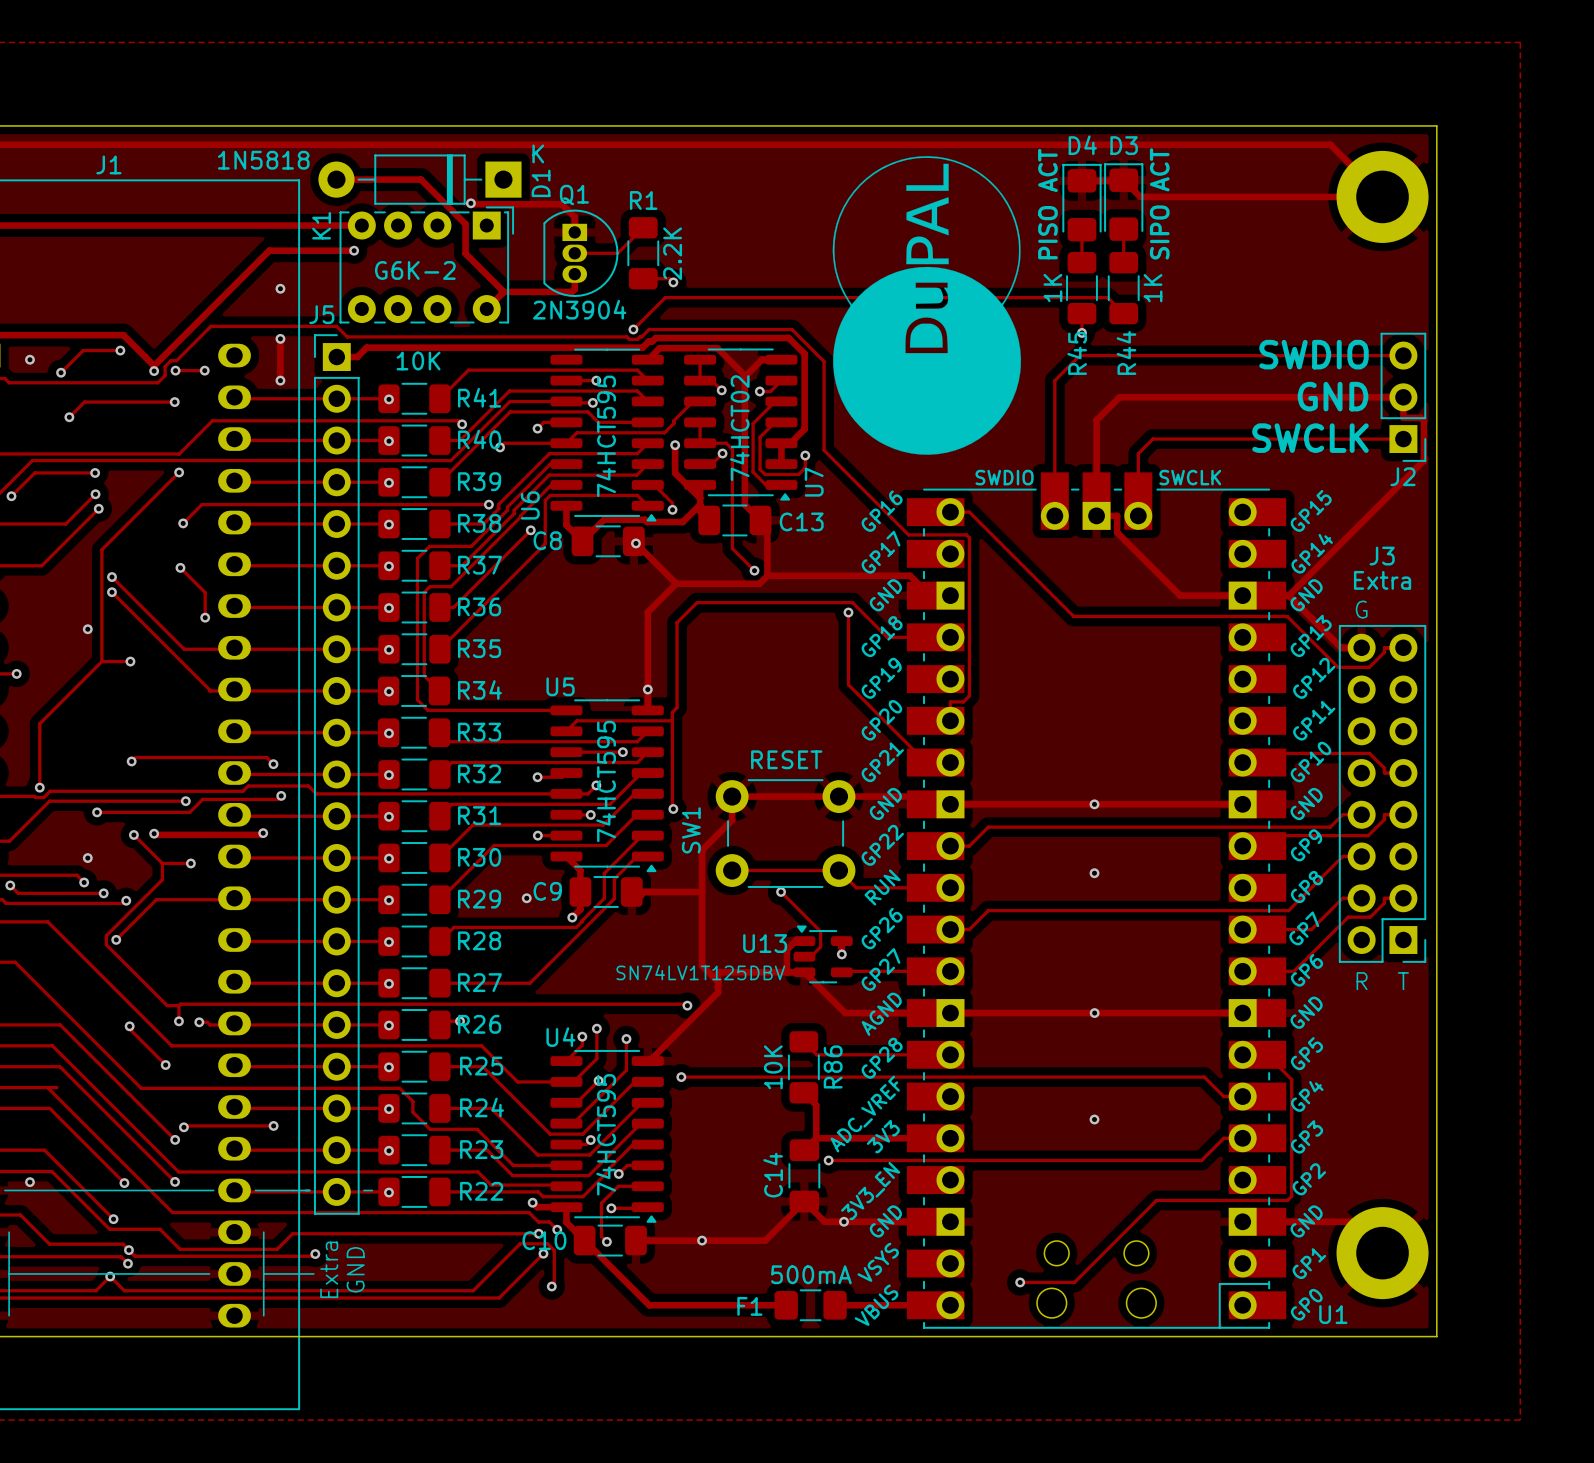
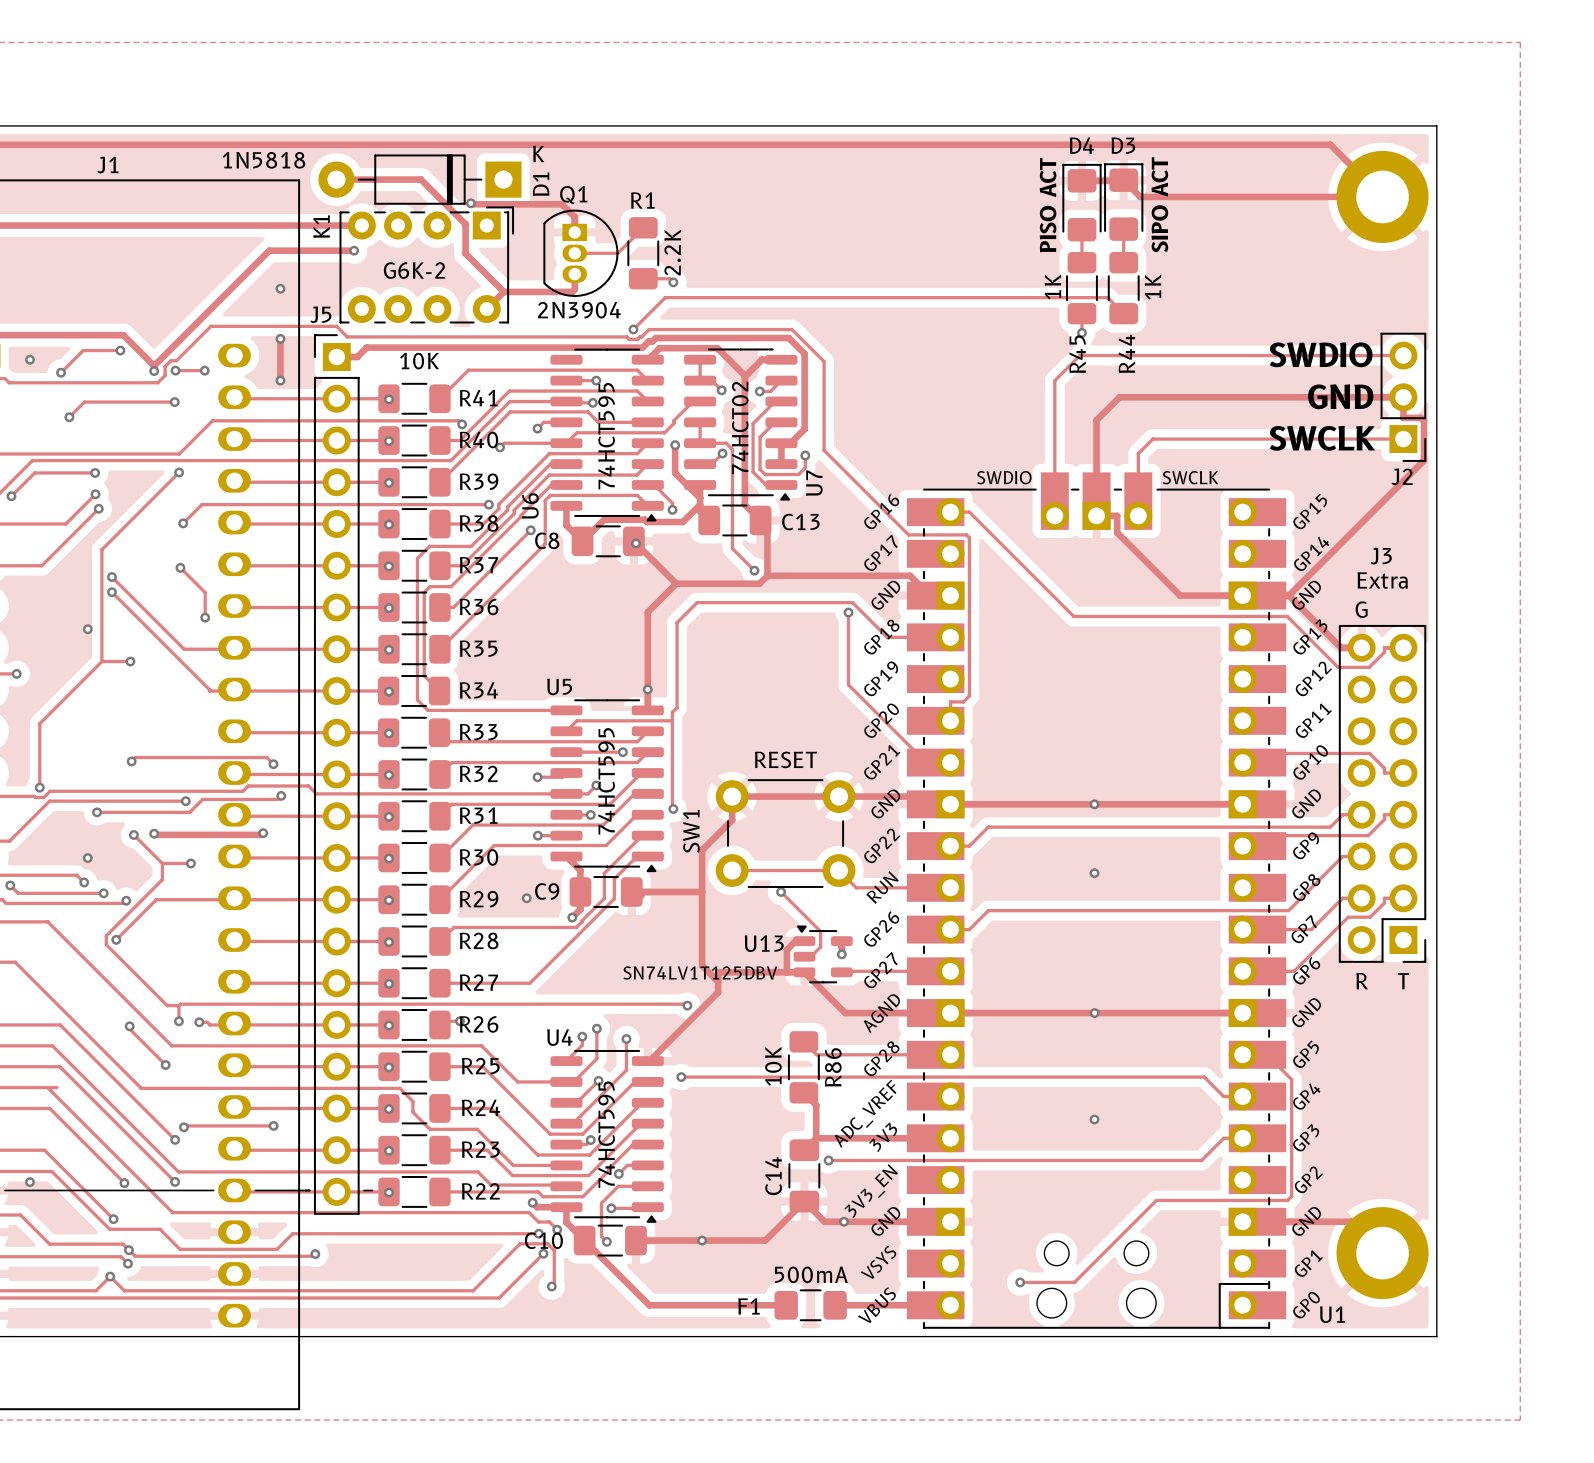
drawing: [832, 156, 1021, 455] -> none
line: (9, 1232) (9, 1315) -> none
line: (263, 1232) (263, 1315) -> none
text: Extra (329, 1269) -> none
text: GND (355, 1269) -> none
line: (9, 1273) (209, 1273) -> none
line: (263, 1273) (313, 1273) -> none

